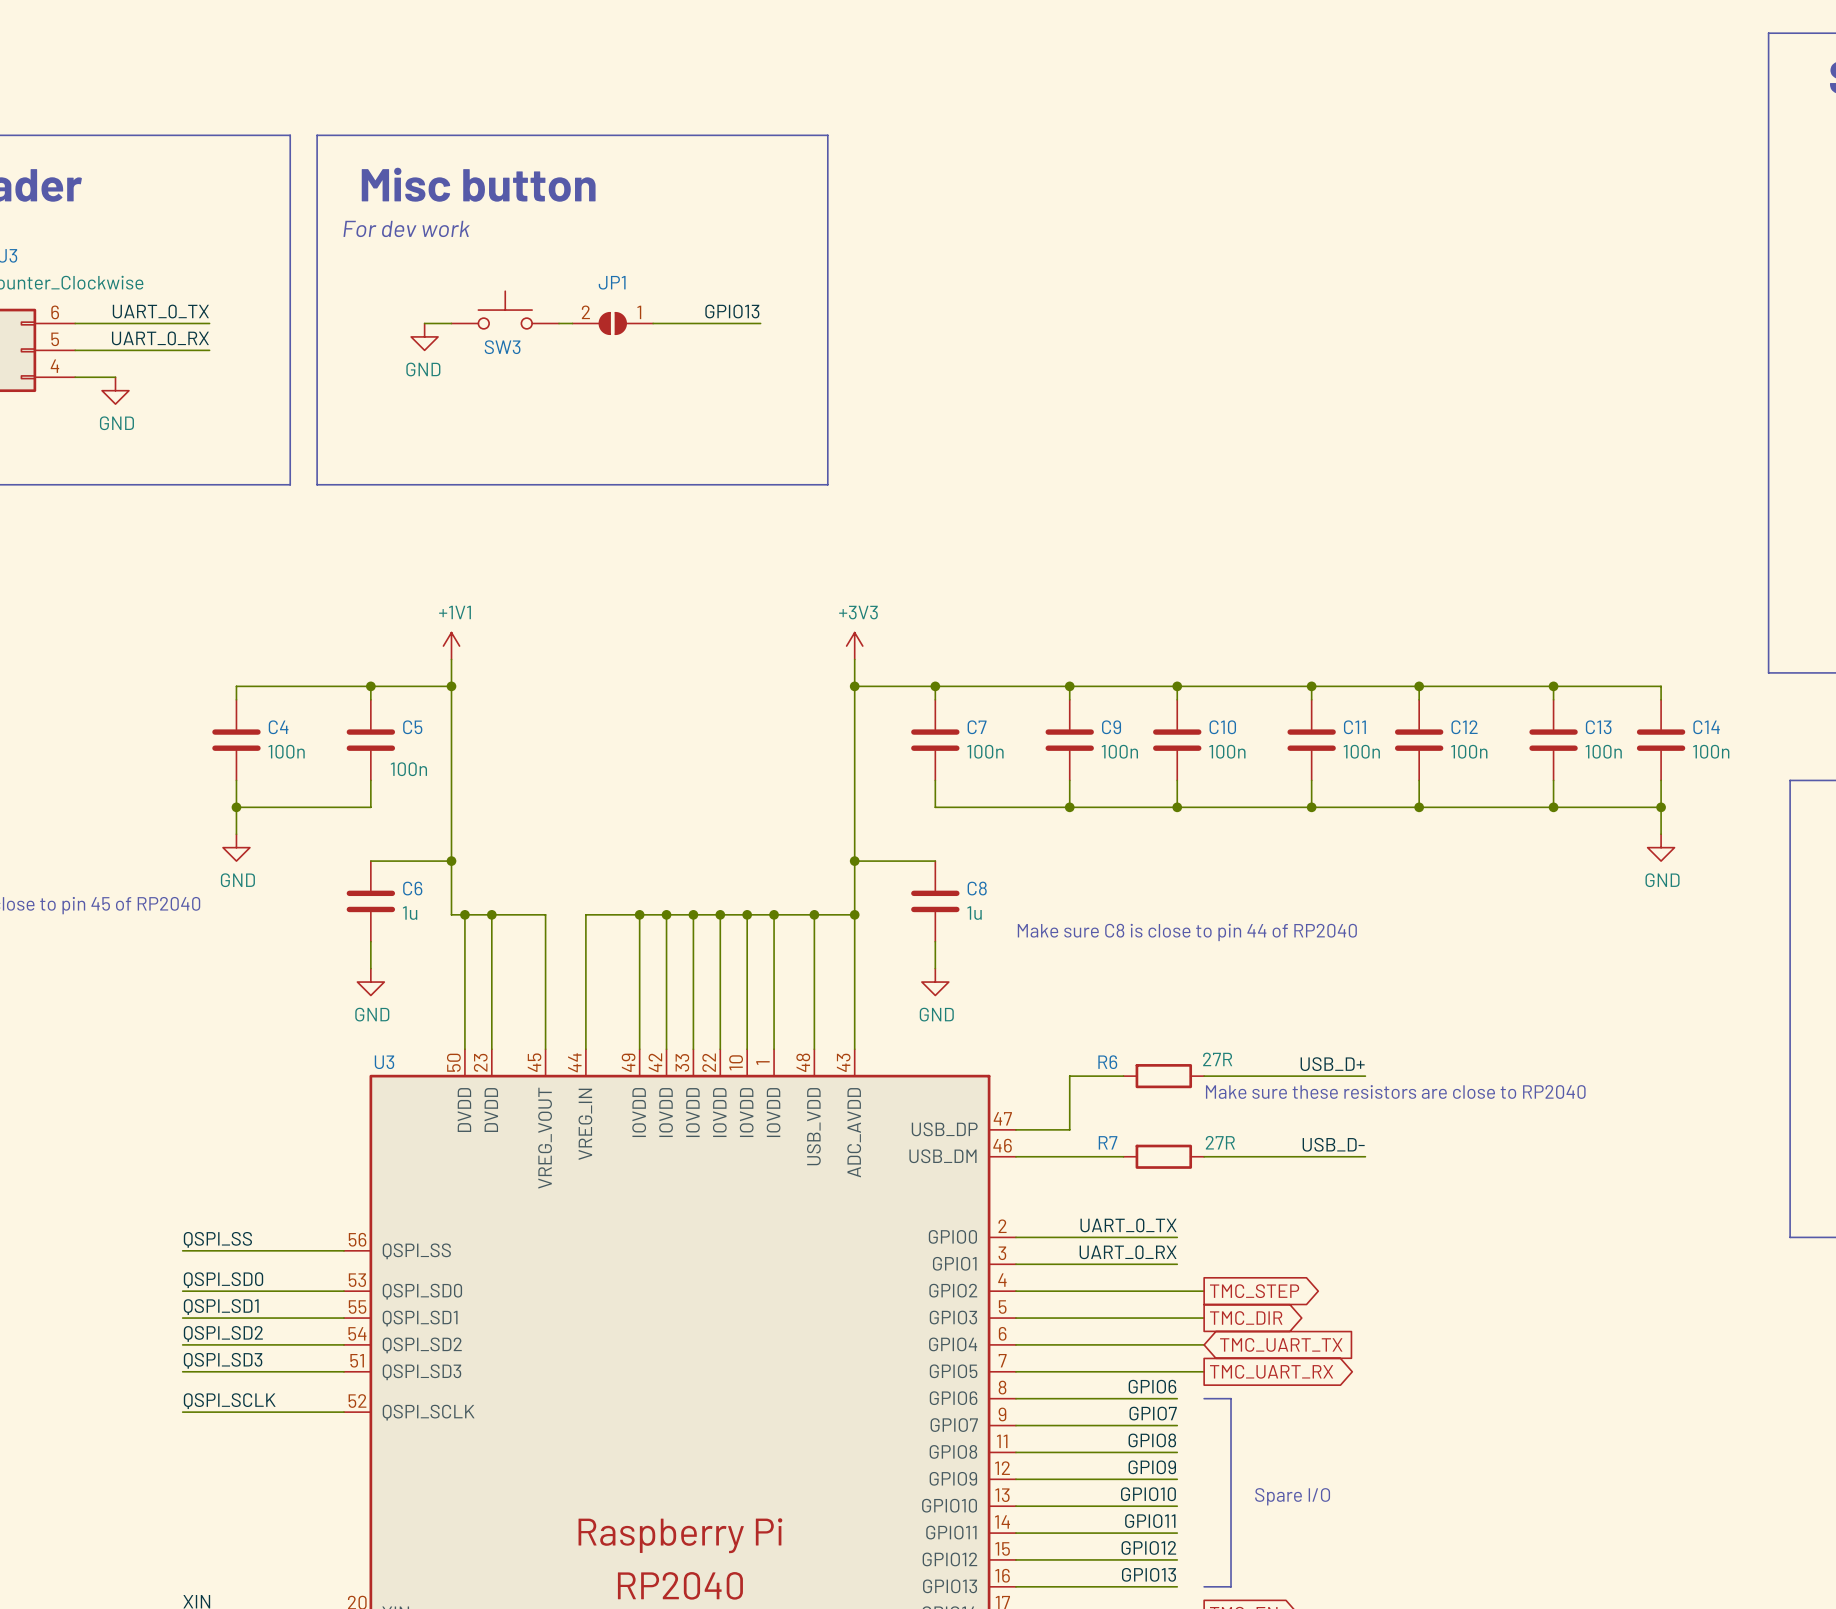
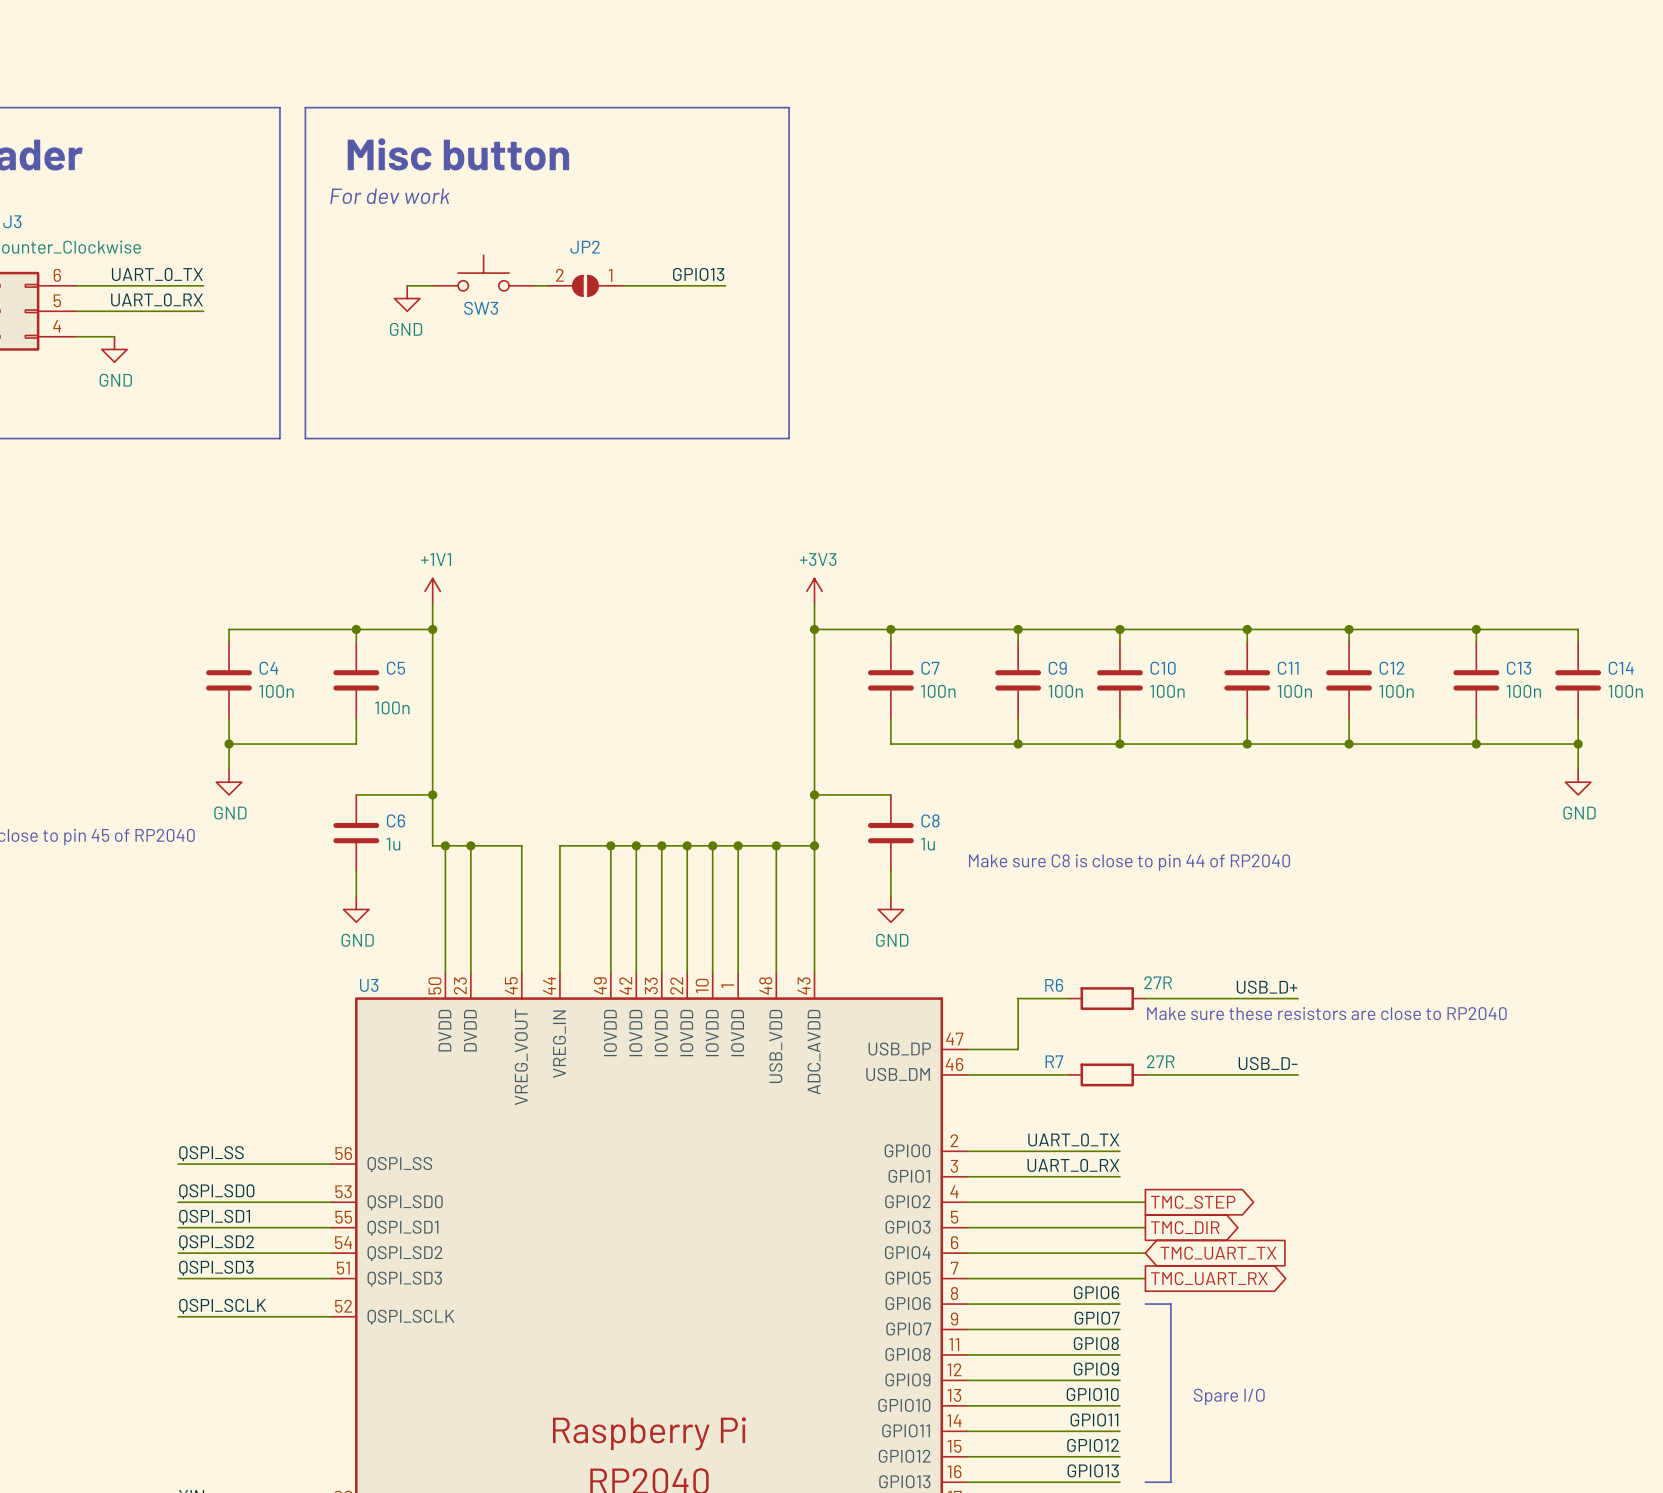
JP1 name: JP1 (612, 282) -> JP2 (585, 247)

